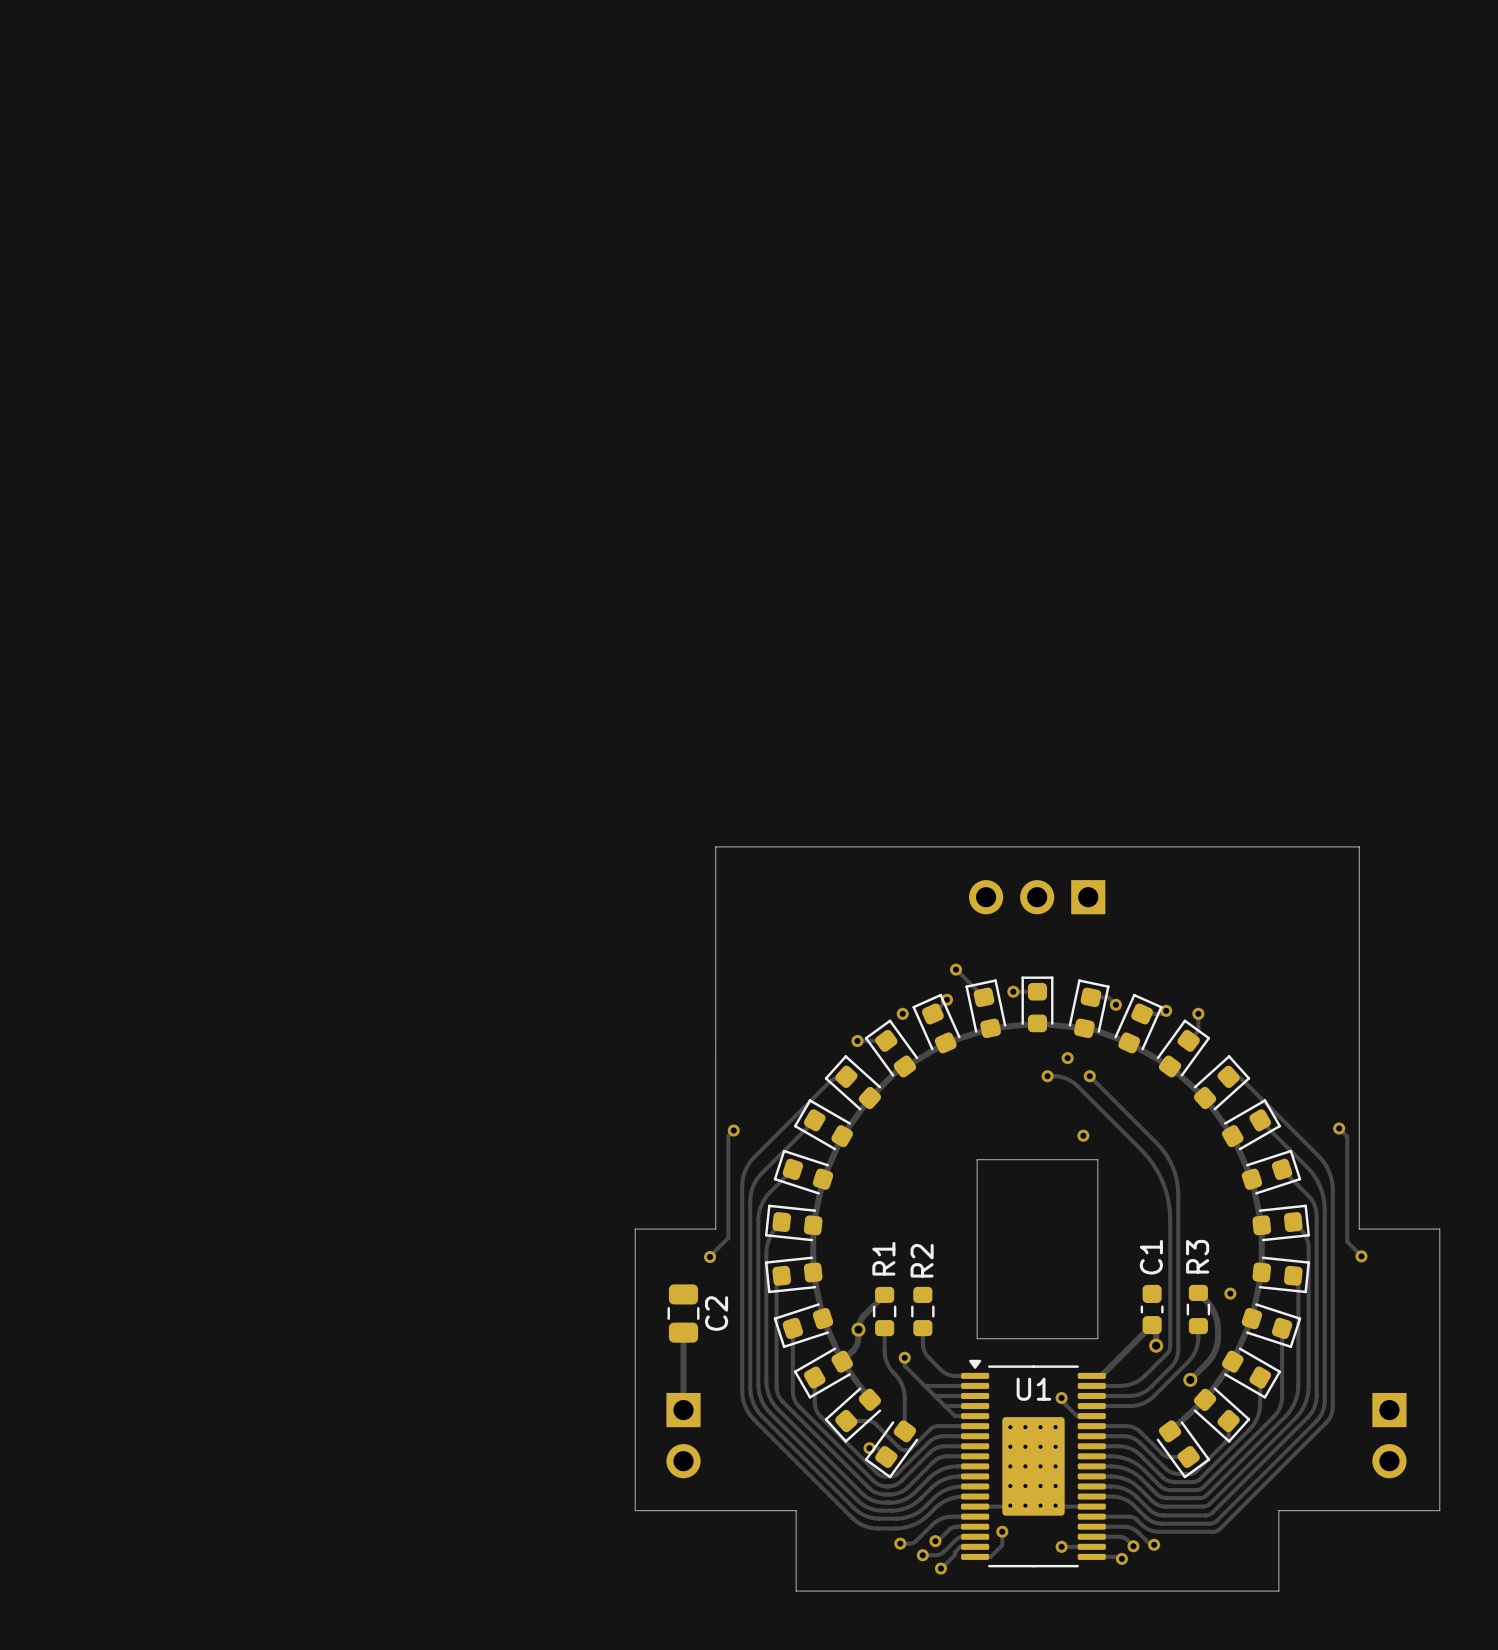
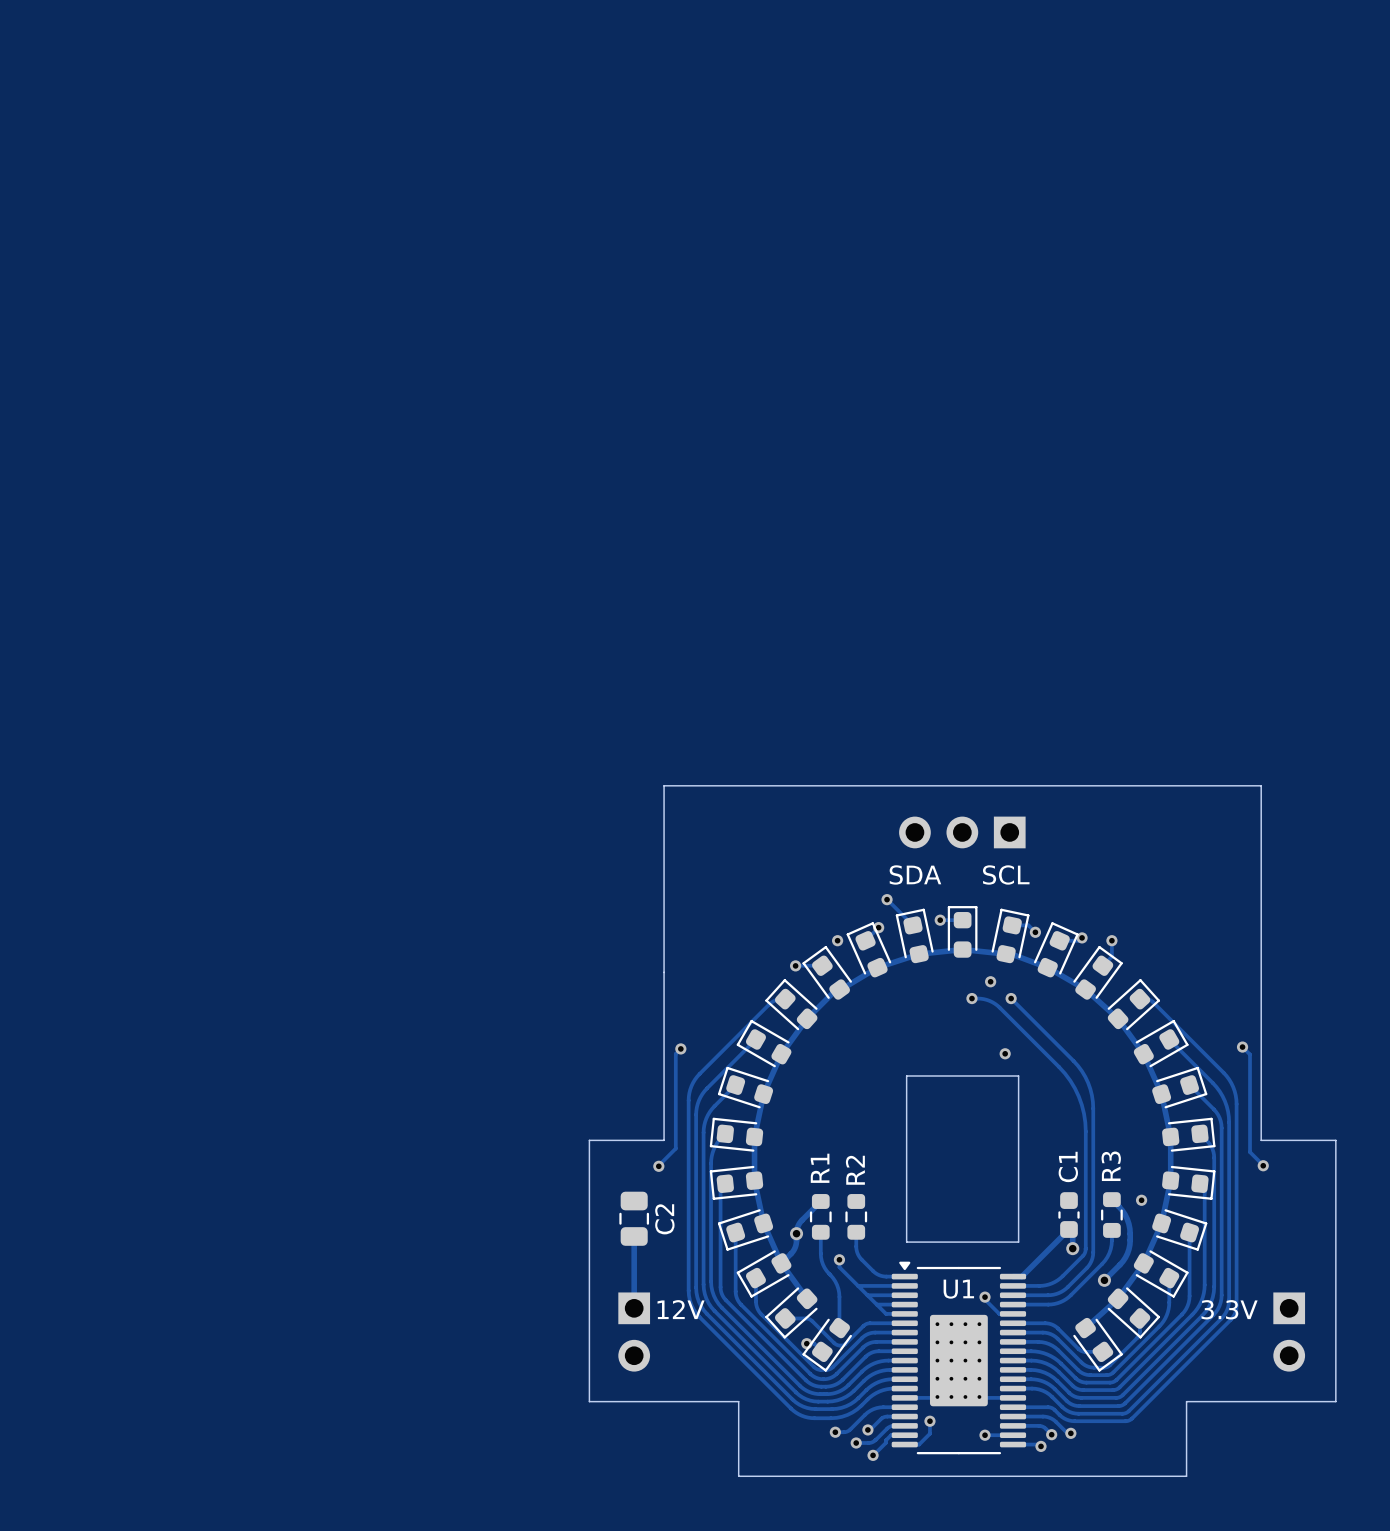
text: none -> SDA (915, 874)
text: none -> SCL (1006, 874)
text: none -> 12V (681, 1309)
text: none -> 3.3V (1229, 1309)

